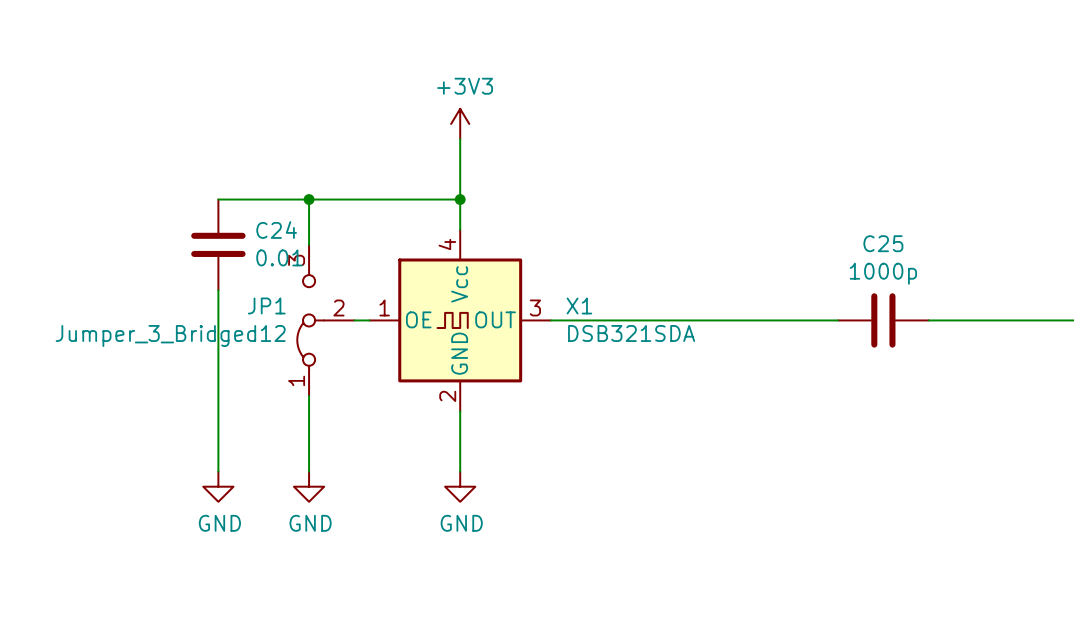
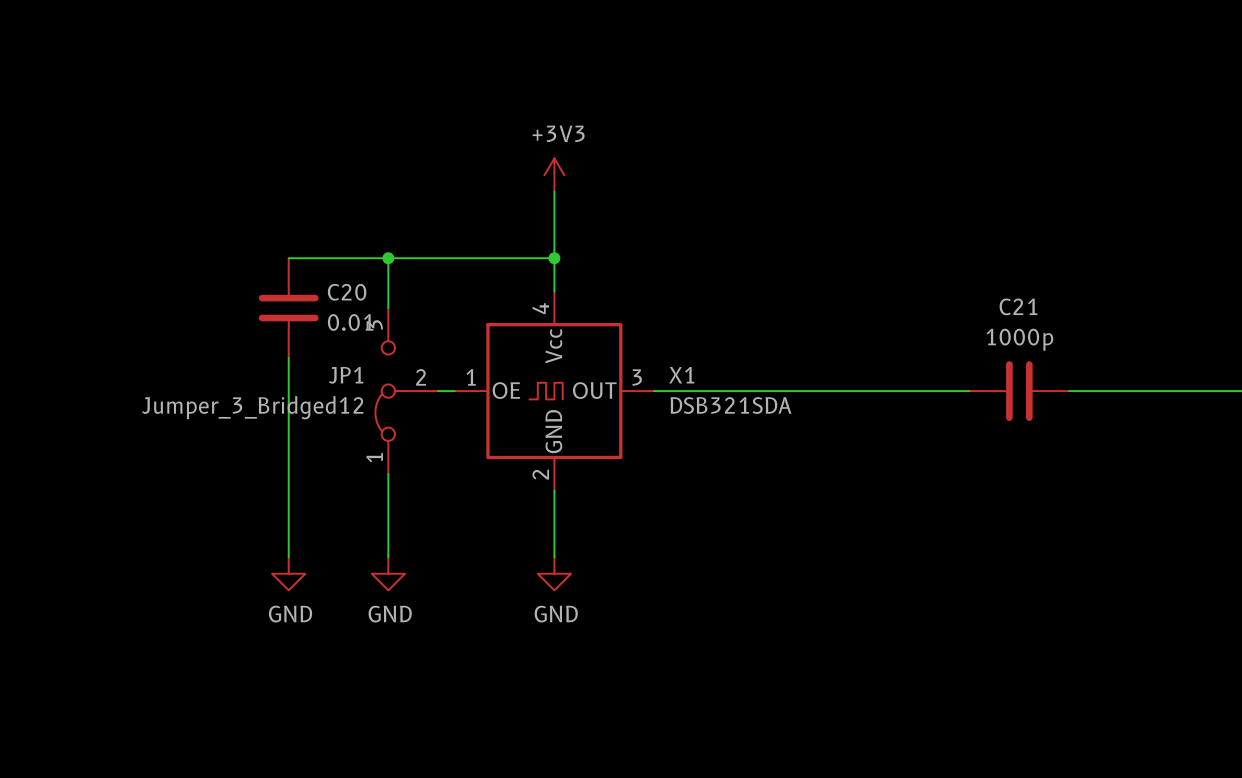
C24 name: C24 (276, 230) -> C20 (347, 292)
C25 name: C25 (883, 243) -> C21 (1018, 306)

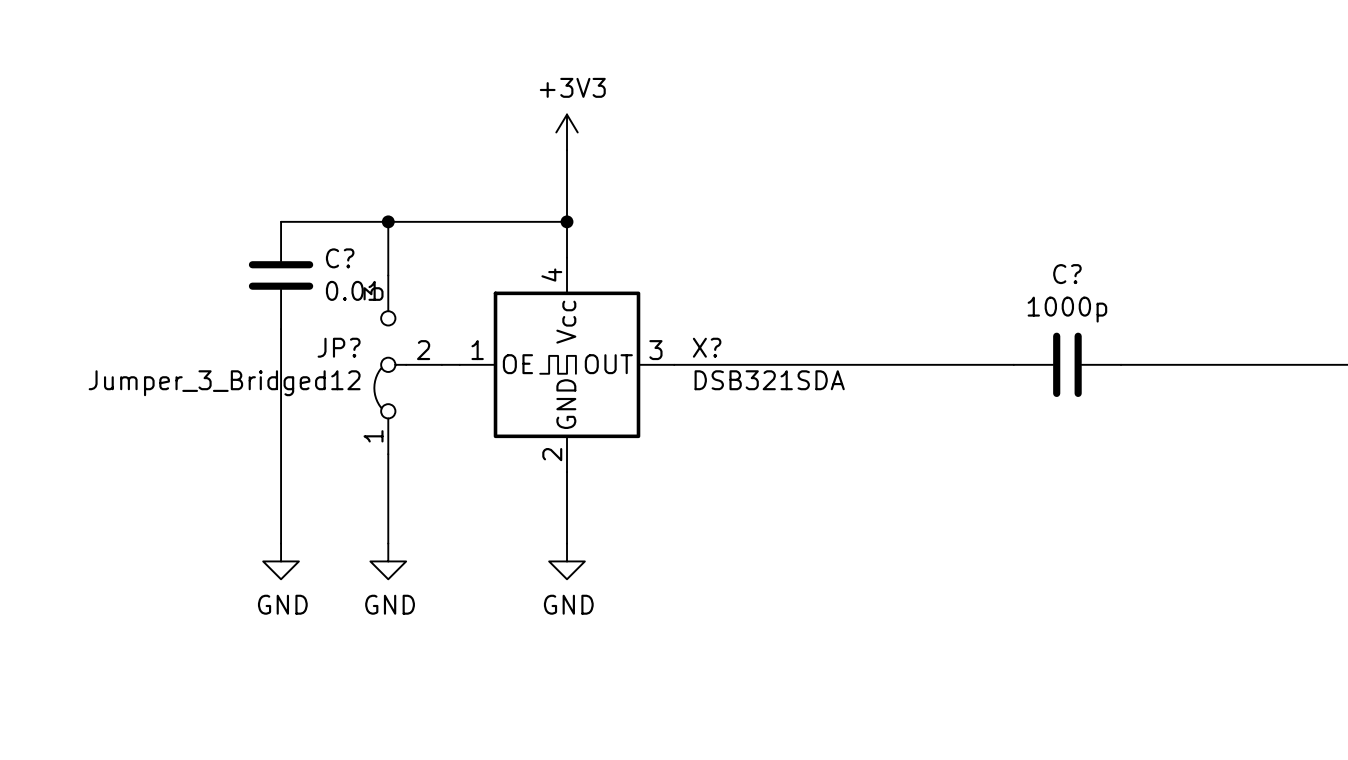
C20 name: C20 (347, 292) -> C? (340, 258)
C21 name: C21 (1018, 306) -> C? (1067, 274)
JP1 name: JP1 (346, 375) -> JP? (339, 347)
X1 name: X1 (681, 375) -> X? (707, 347)

